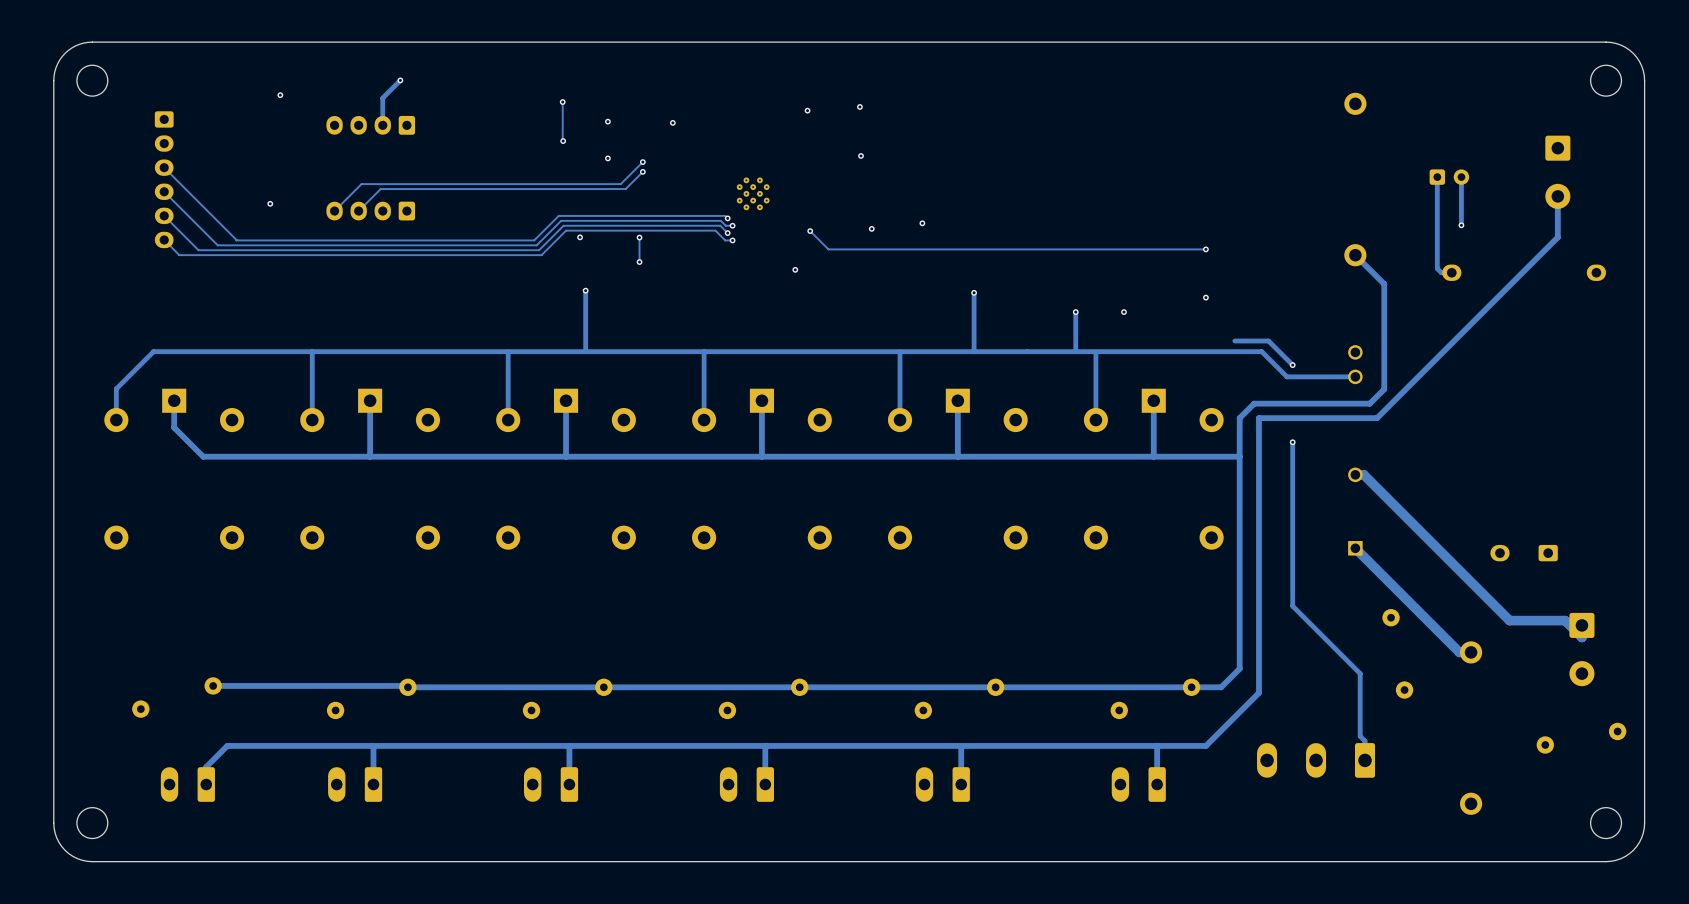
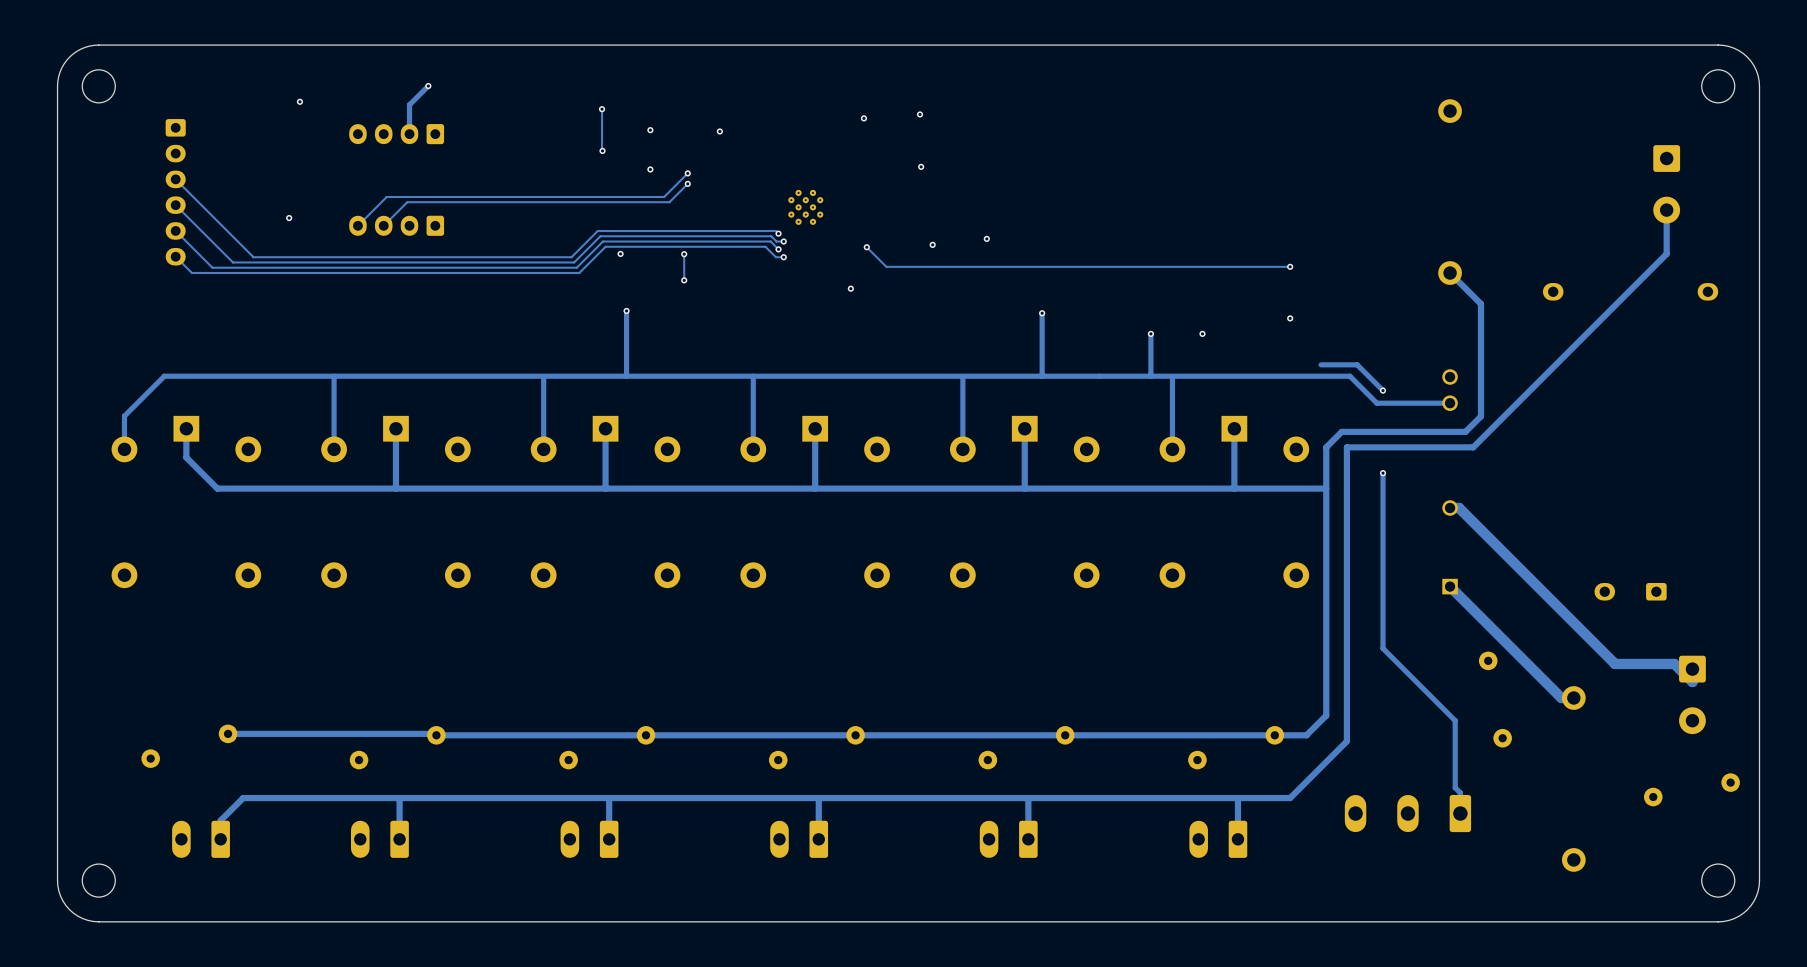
track: (1437, 177) (1437, 268) (1441, 272) (1451, 272) -> none
part: (1449, 177) -> none
track: (1461, 177) (1461, 225) -> none
via: (1461, 225) -> none

